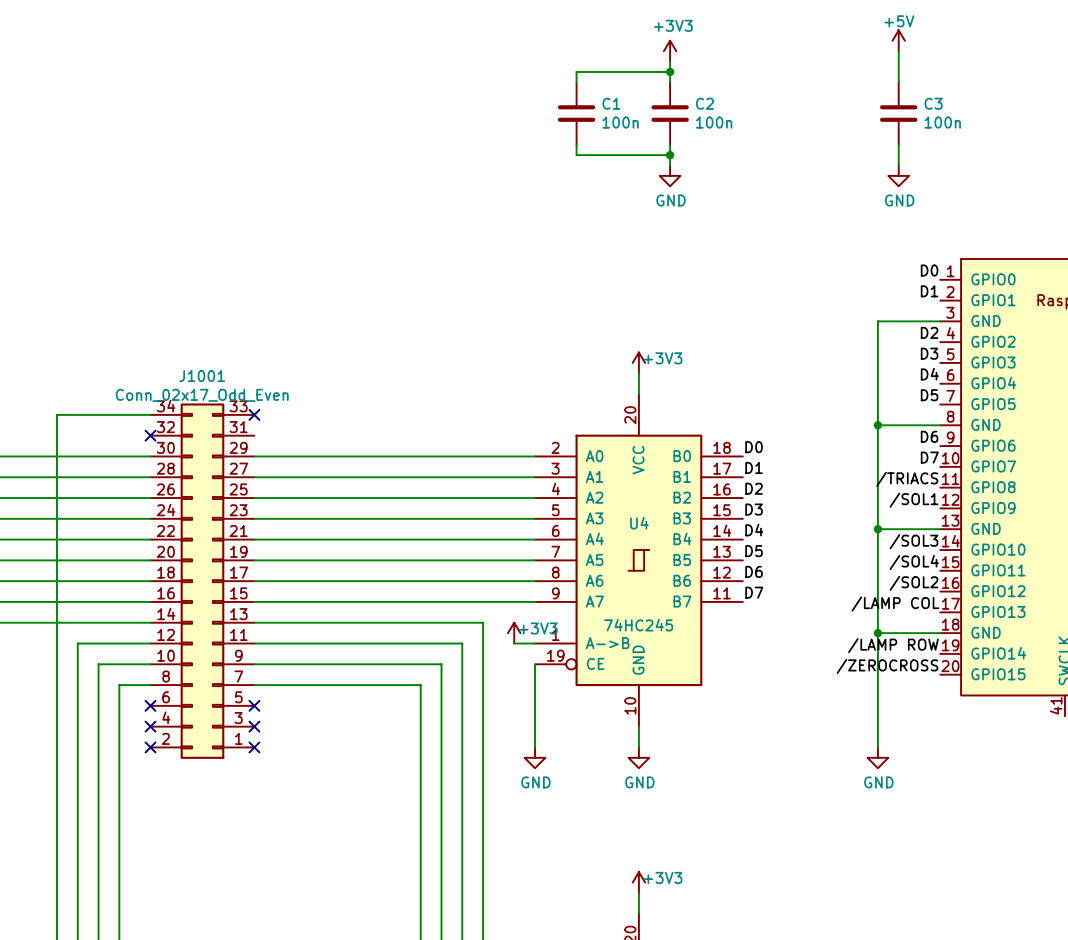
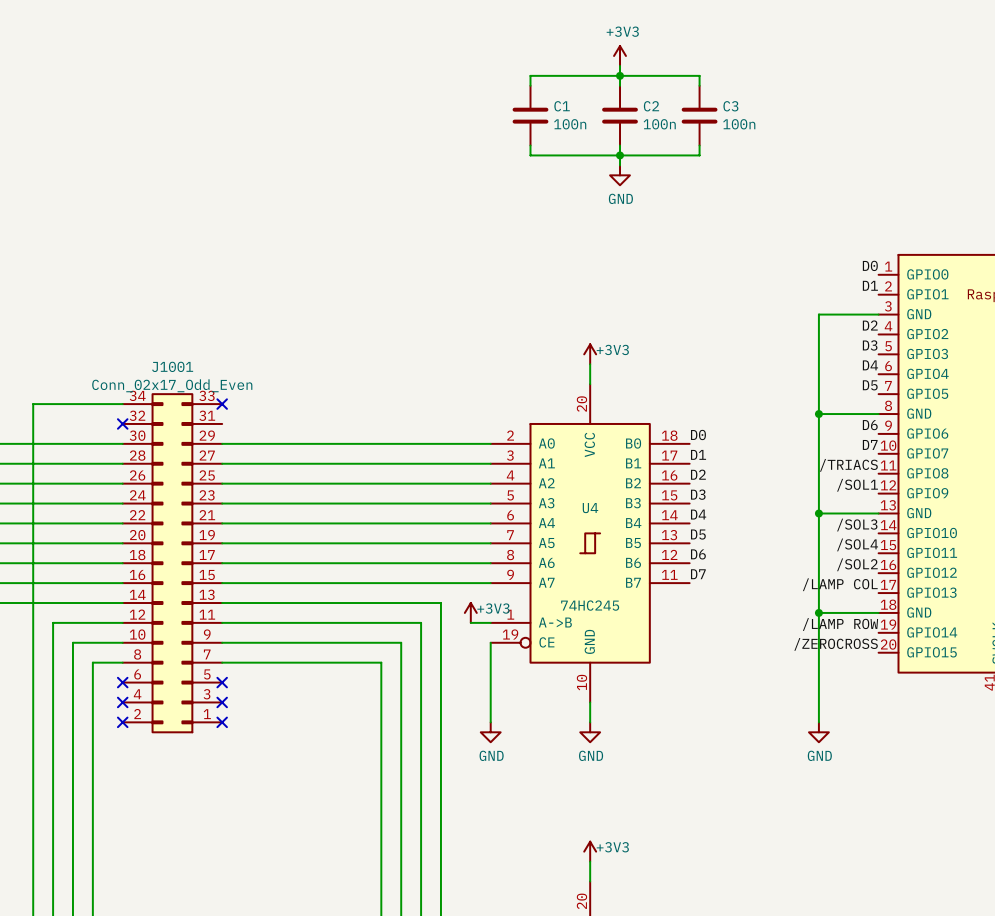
power symbol: +5V (898, 40) -> none
wire: (898, 51) (898, 82) -> none
wire: none -> (620, 75) (699, 75) (699, 85)
C3 position: (898, 113) -> (699, 115)
wire: none -> (699, 145) (699, 155) (620, 155)
wire: (898, 144) (898, 165) -> none
power symbol: GND (898, 175) -> none

